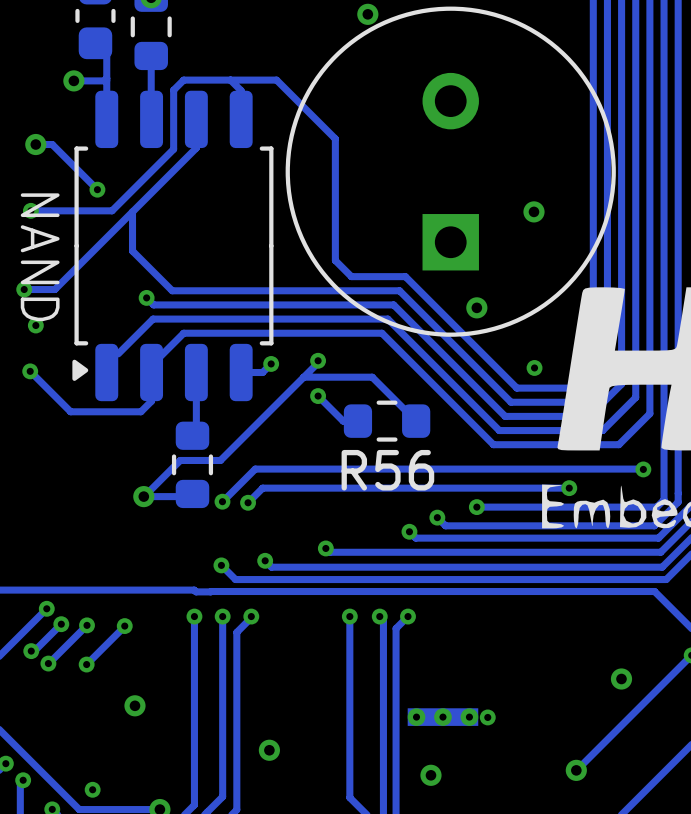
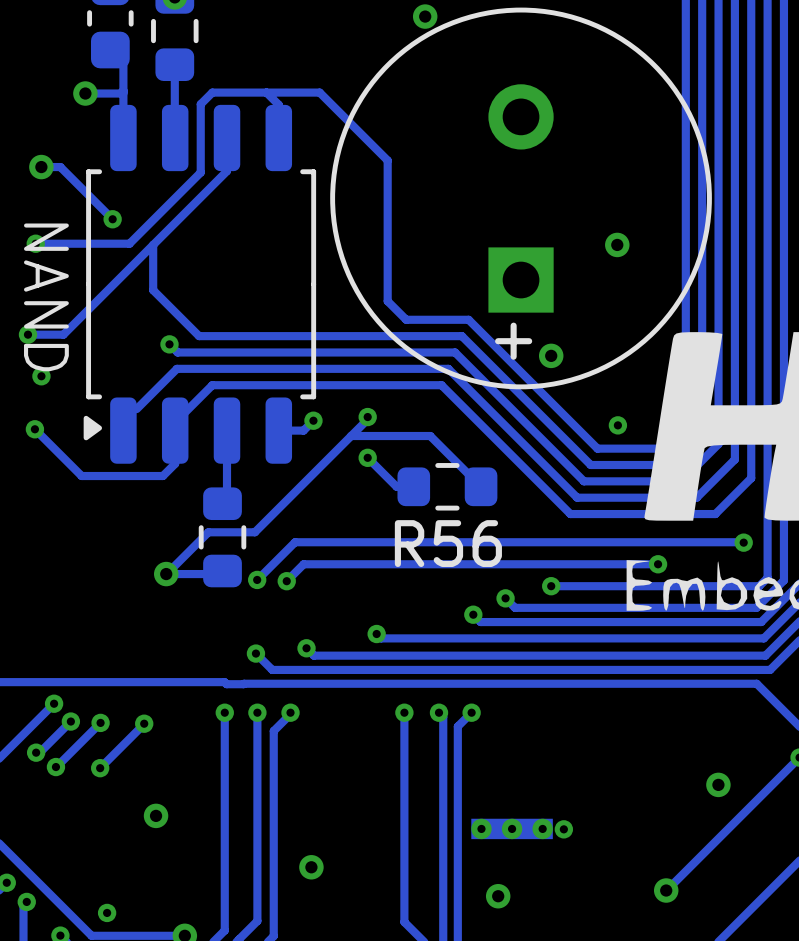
part text: none -> + (513, 341)

